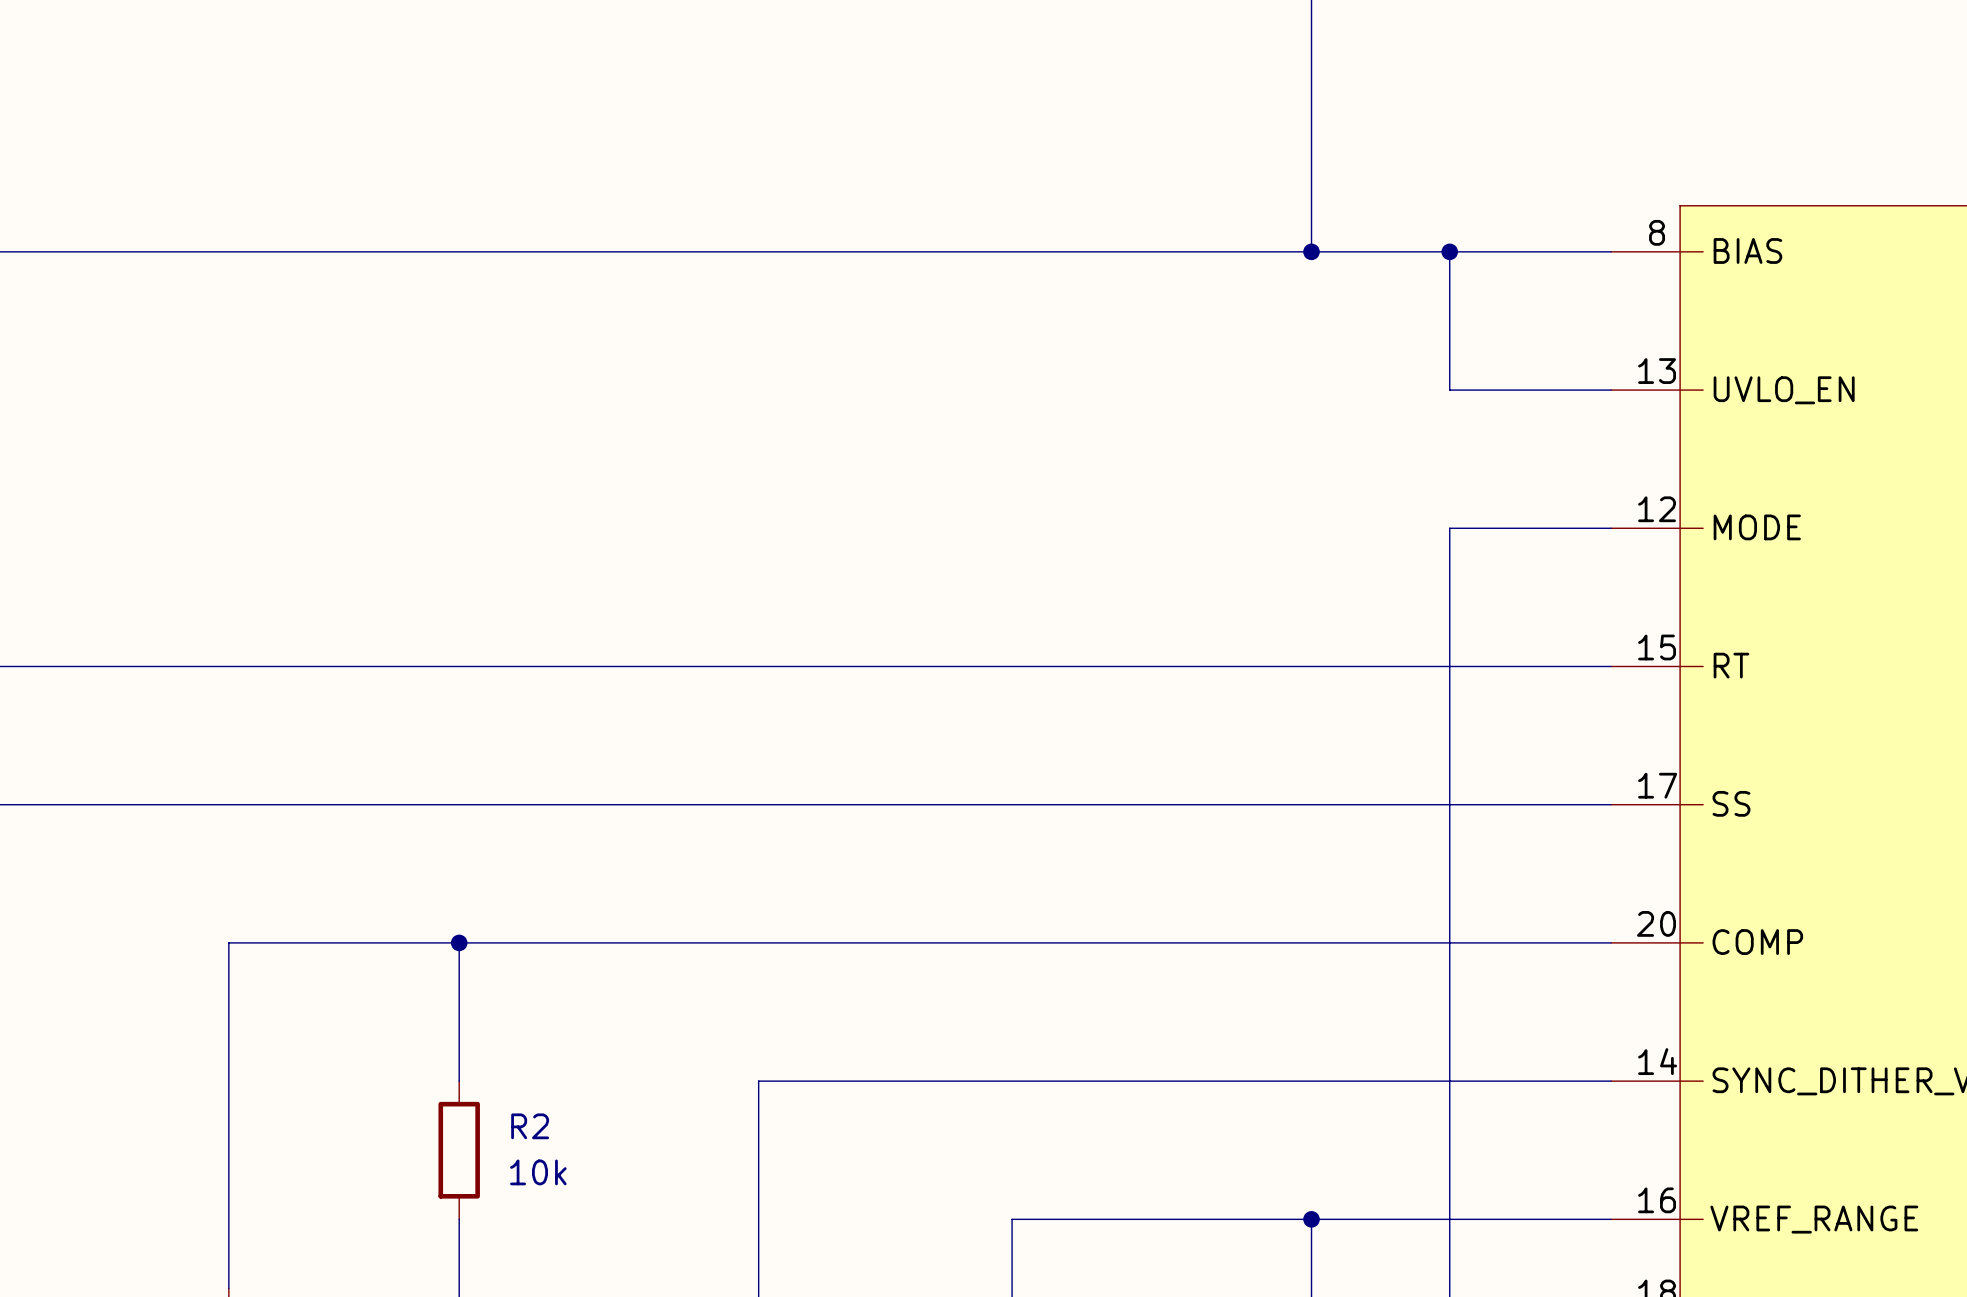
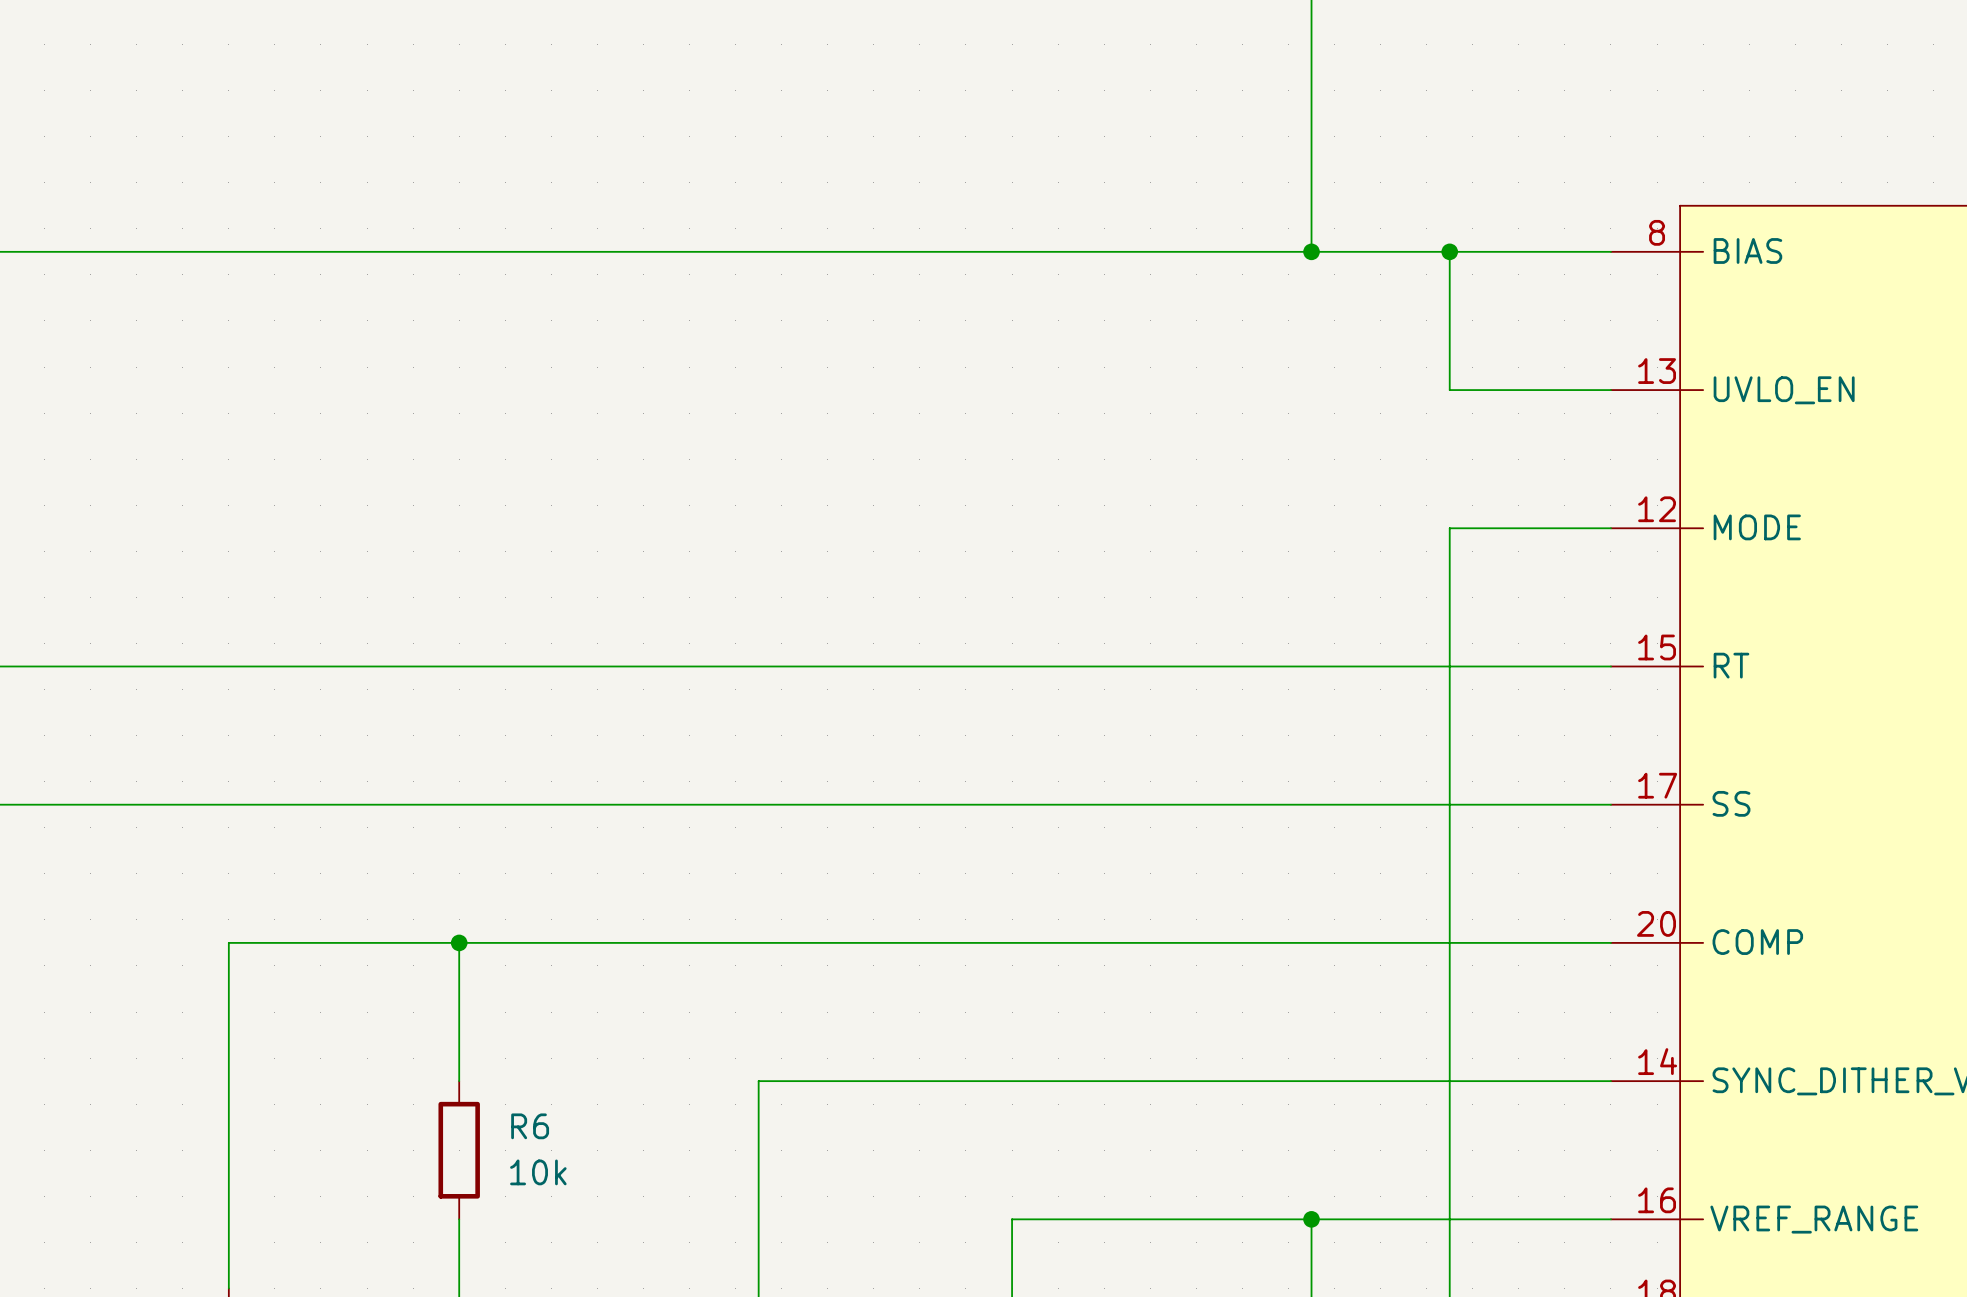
R2 name: R2 (530, 1126) -> R6 (530, 1126)

